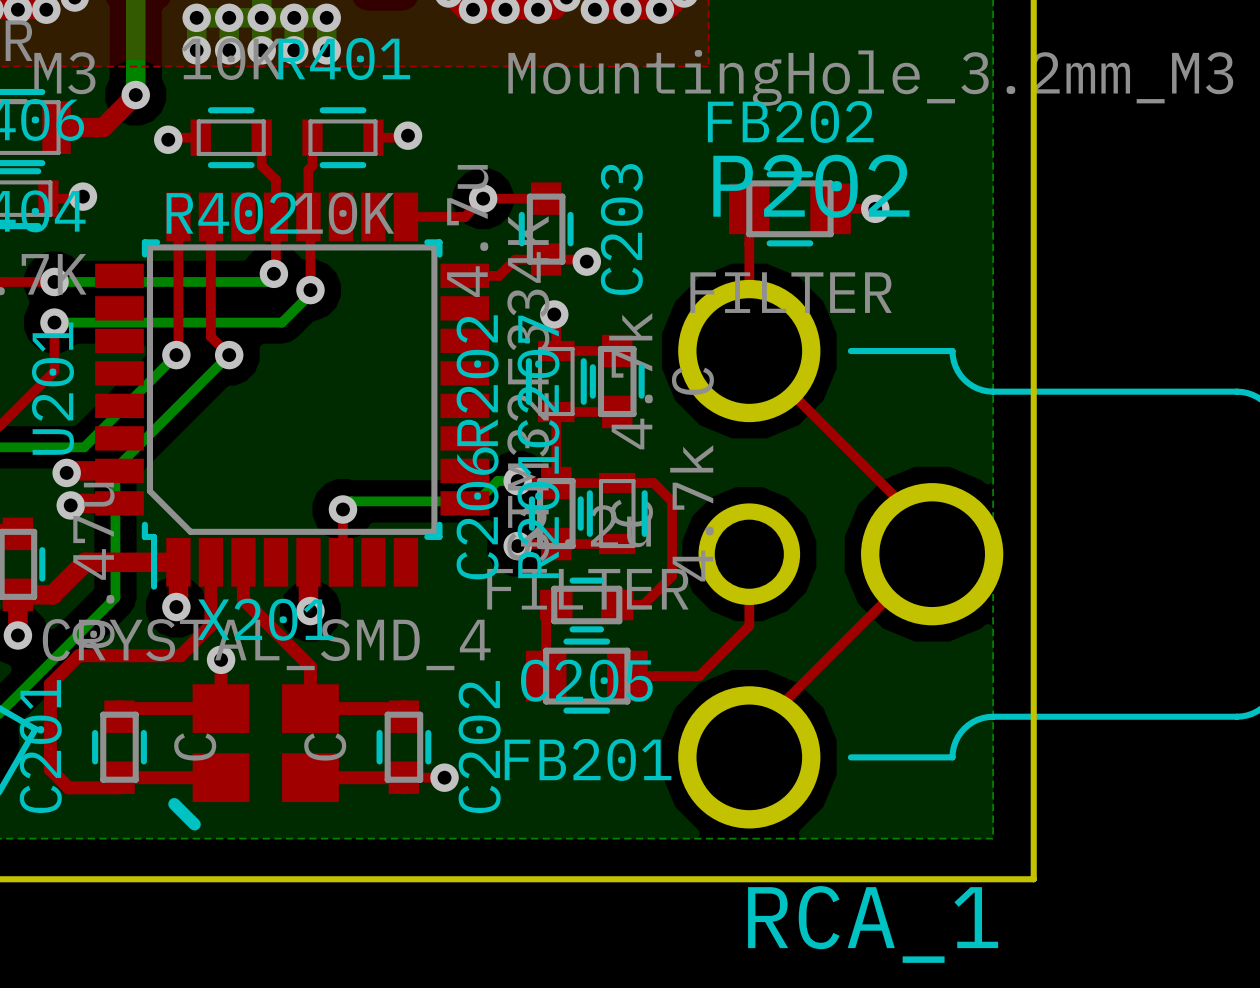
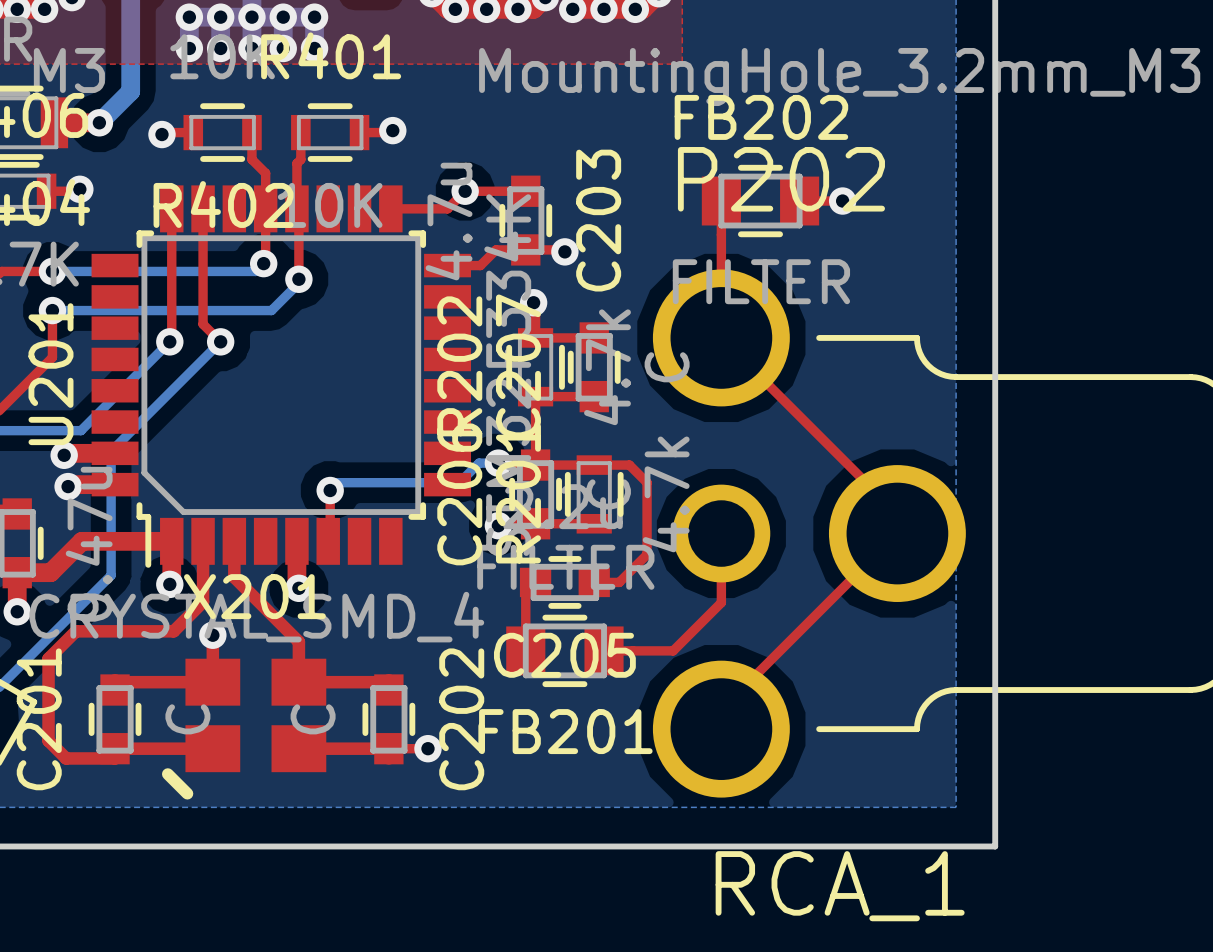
top track: (135, 95) (103, 127) -> none
bottom track: none -> (130, 91) (99, 122)
via position: (135, 95) -> (99, 122)

